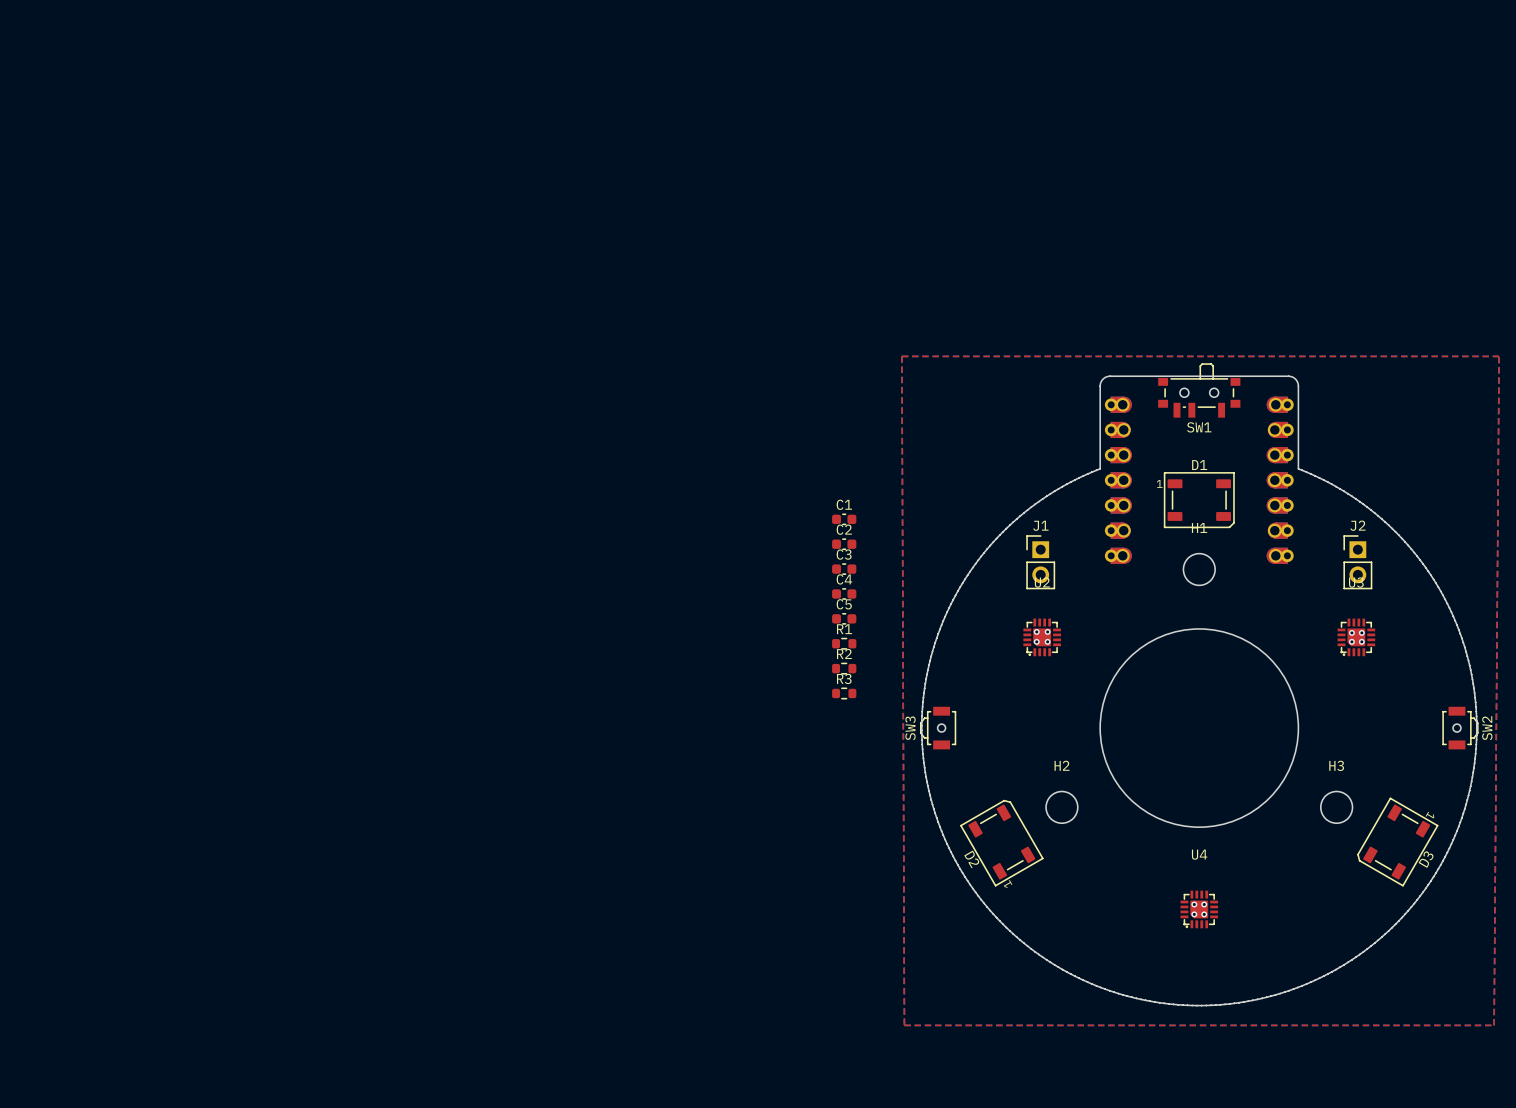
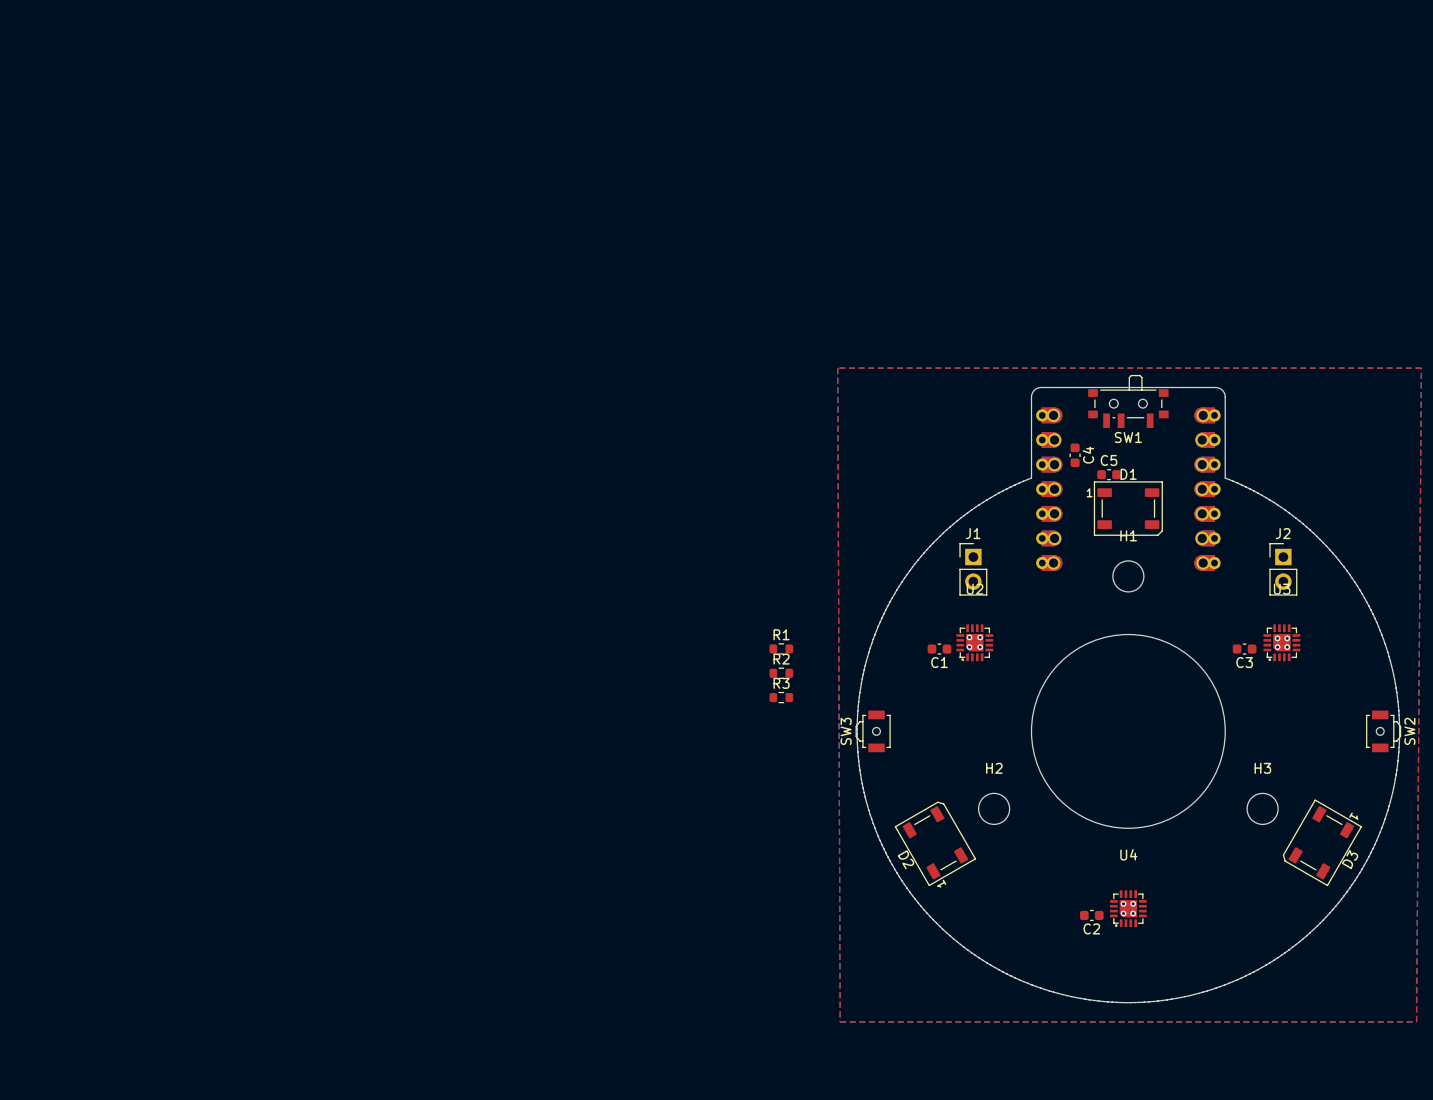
C1 name position: C1 (844, 504) -> C1 (939, 662)
C1 position: (844, 519) -> (939, 649)
C2 name position: C2 (844, 529) -> C2 (1091, 928)
C2 position: (844, 544) -> (1091, 915)
C3 name position: C3 (844, 554) -> C3 (1244, 662)
C3 position: (844, 569) -> (1244, 649)
C4 rotation: 0° (844, 593) -> 90° clockwise (1075, 455)
C4 position: (844, 593) -> (1075, 455)
C5 position: (844, 618) -> (1108, 474)

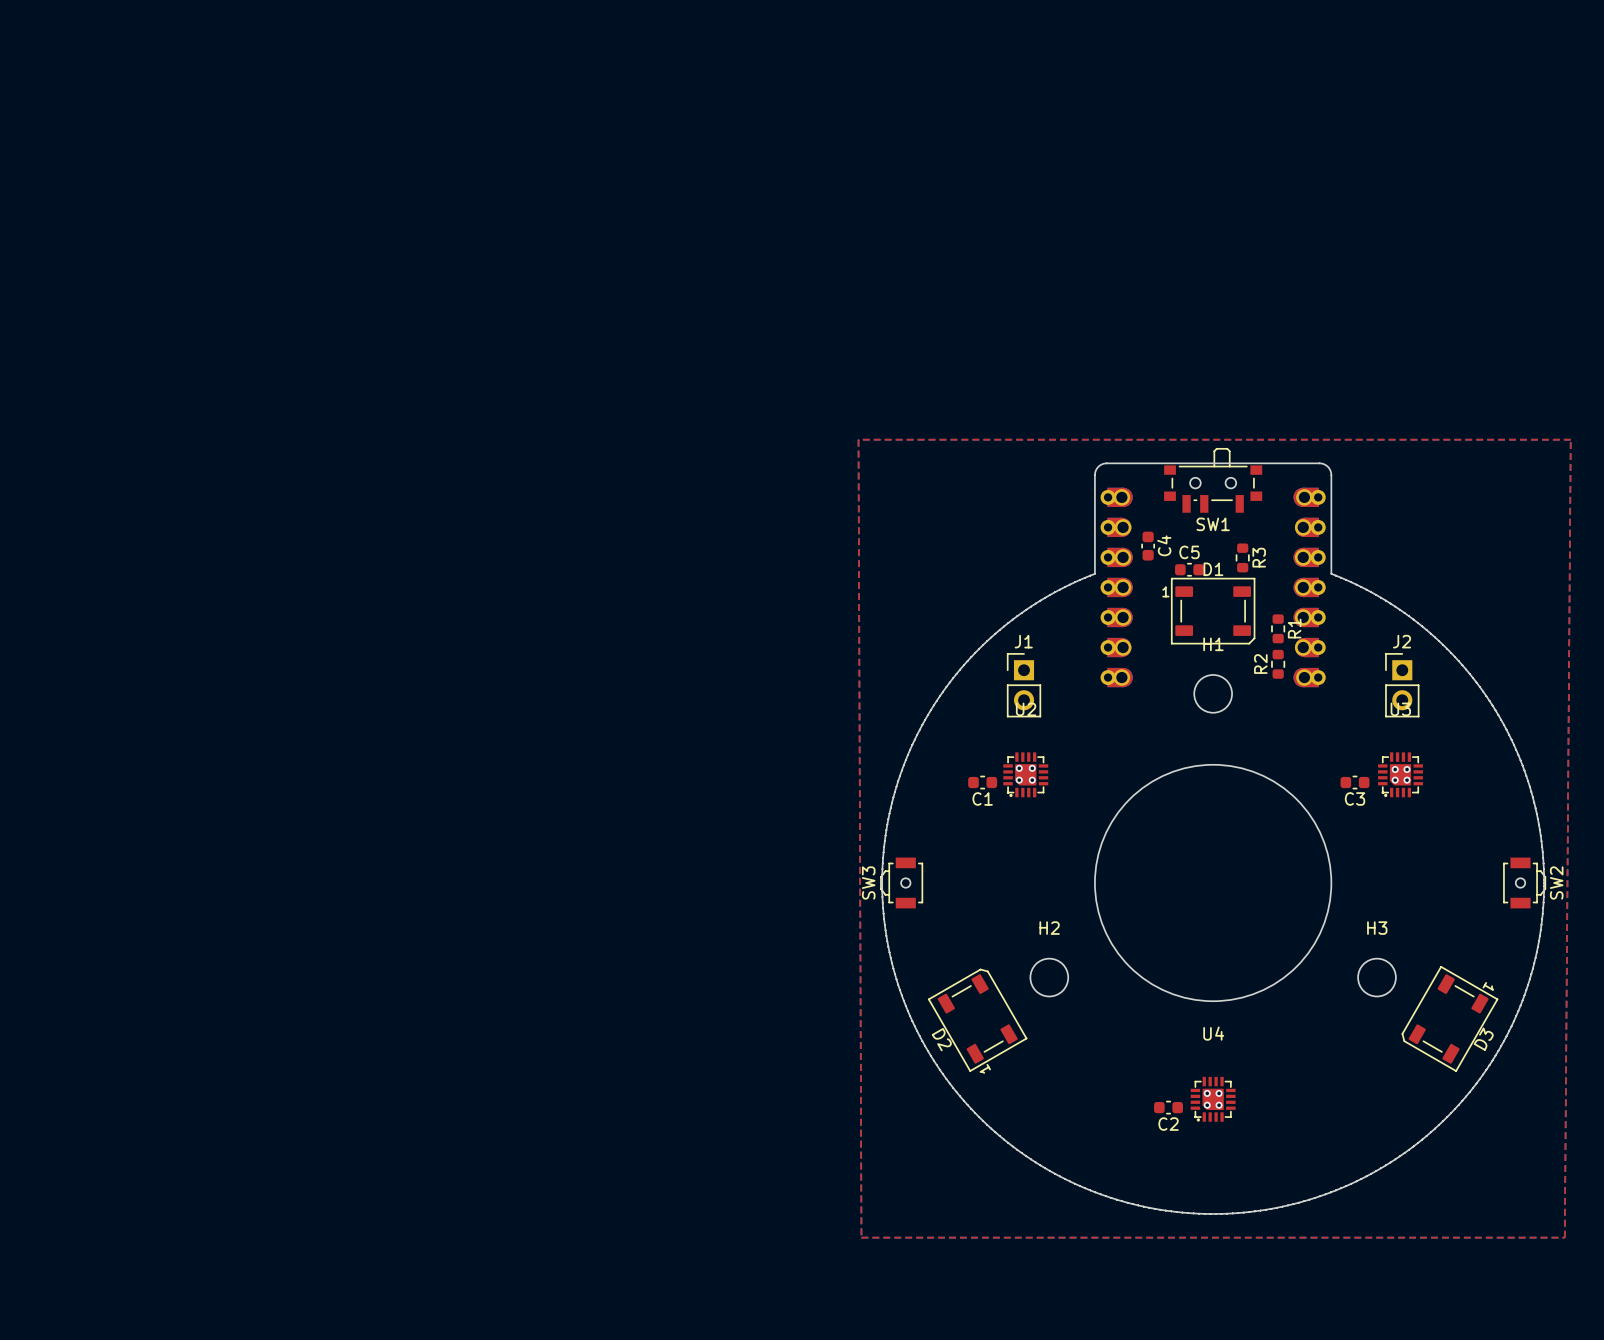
R1 rotation: 0° (781, 648) -> 90° clockwise (1278, 628)
R1 position: (781, 648) -> (1278, 628)
R2 name position: R2 (781, 659) -> R2 (1260, 664)
R2 rotation: 0° (781, 673) -> 90° clockwise (1278, 664)
R2 position: (781, 673) -> (1278, 664)
R3 rotation: 0° (781, 697) -> 90° clockwise (1242, 557)
R3 position: (781, 697) -> (1242, 557)

